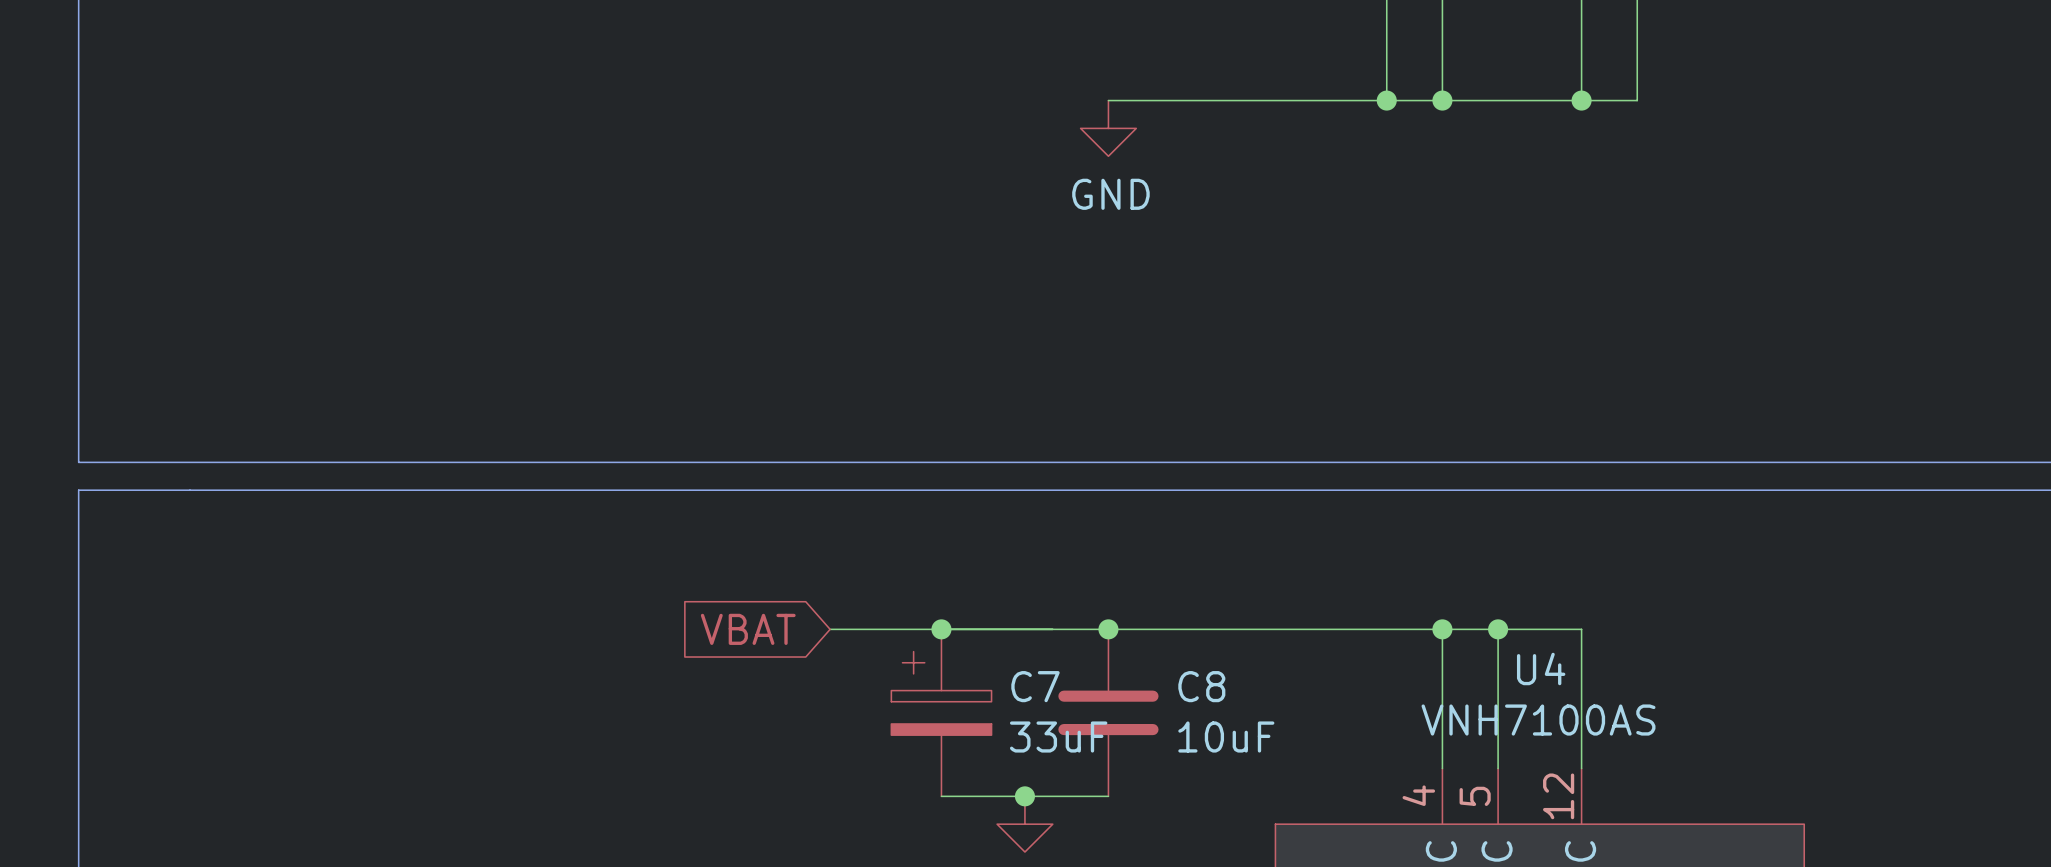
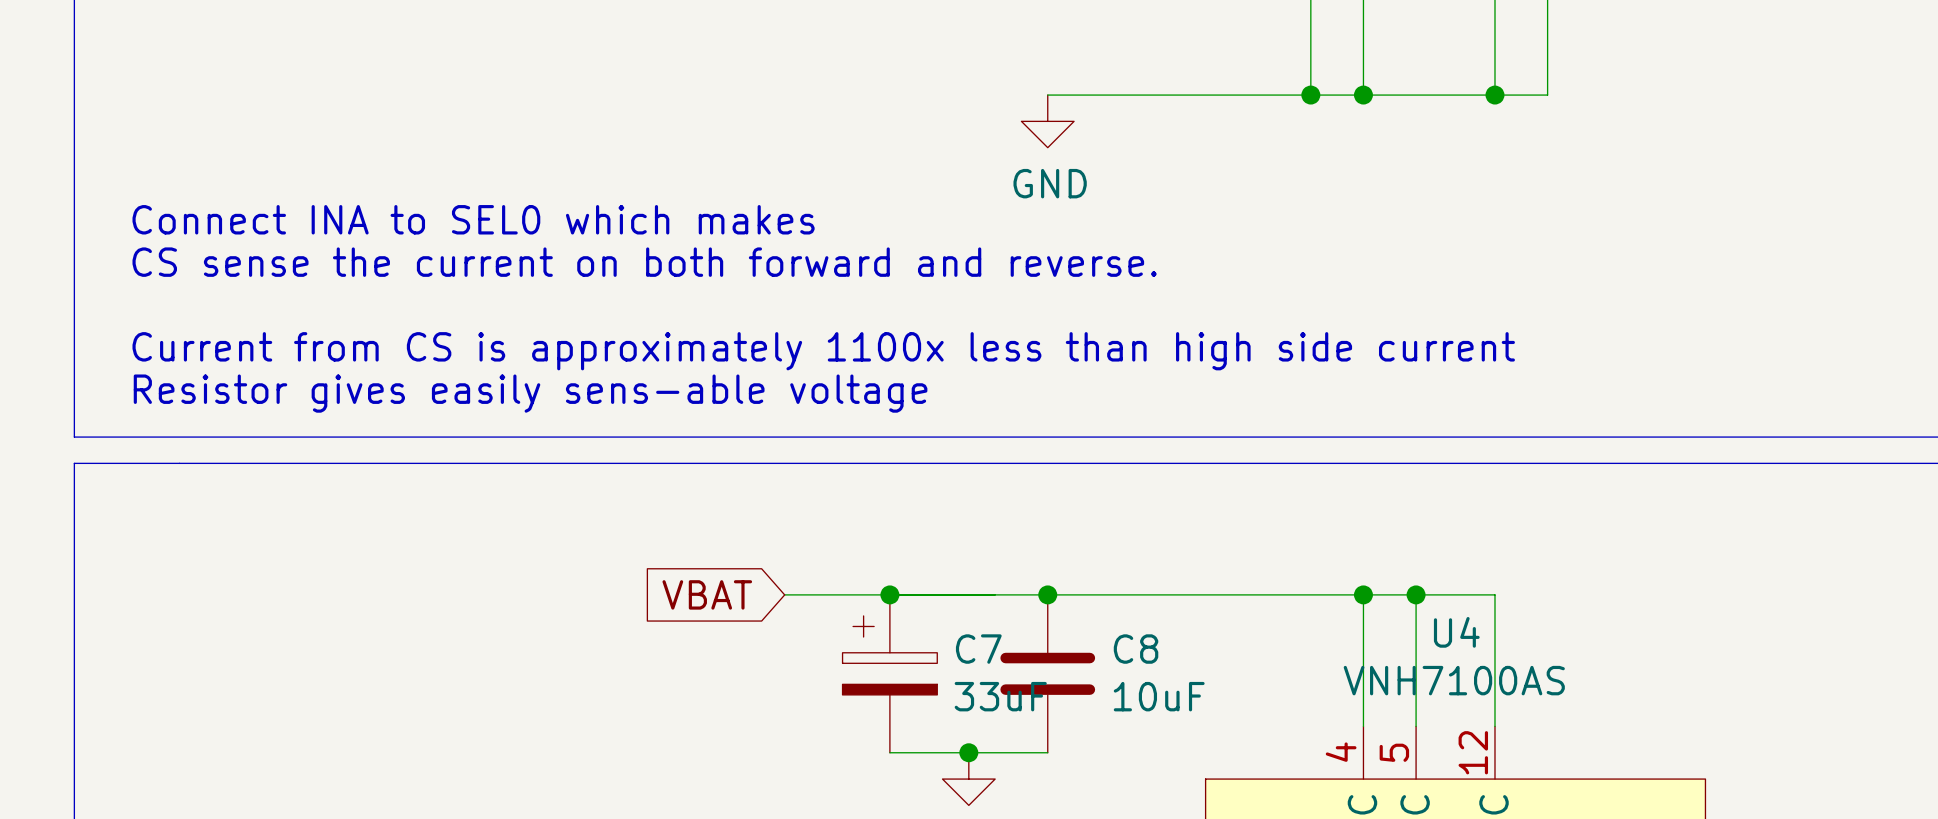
text: none -> Connect INA to SEL0 which makes (473, 219)
text: none -> CS sense the current on both forward and reverse. (644, 262)
text: none -> Current from CS is approximately 1100x less than high side current (823, 351)
text: none -> Resistor gives easily sens-able voltage (530, 393)

